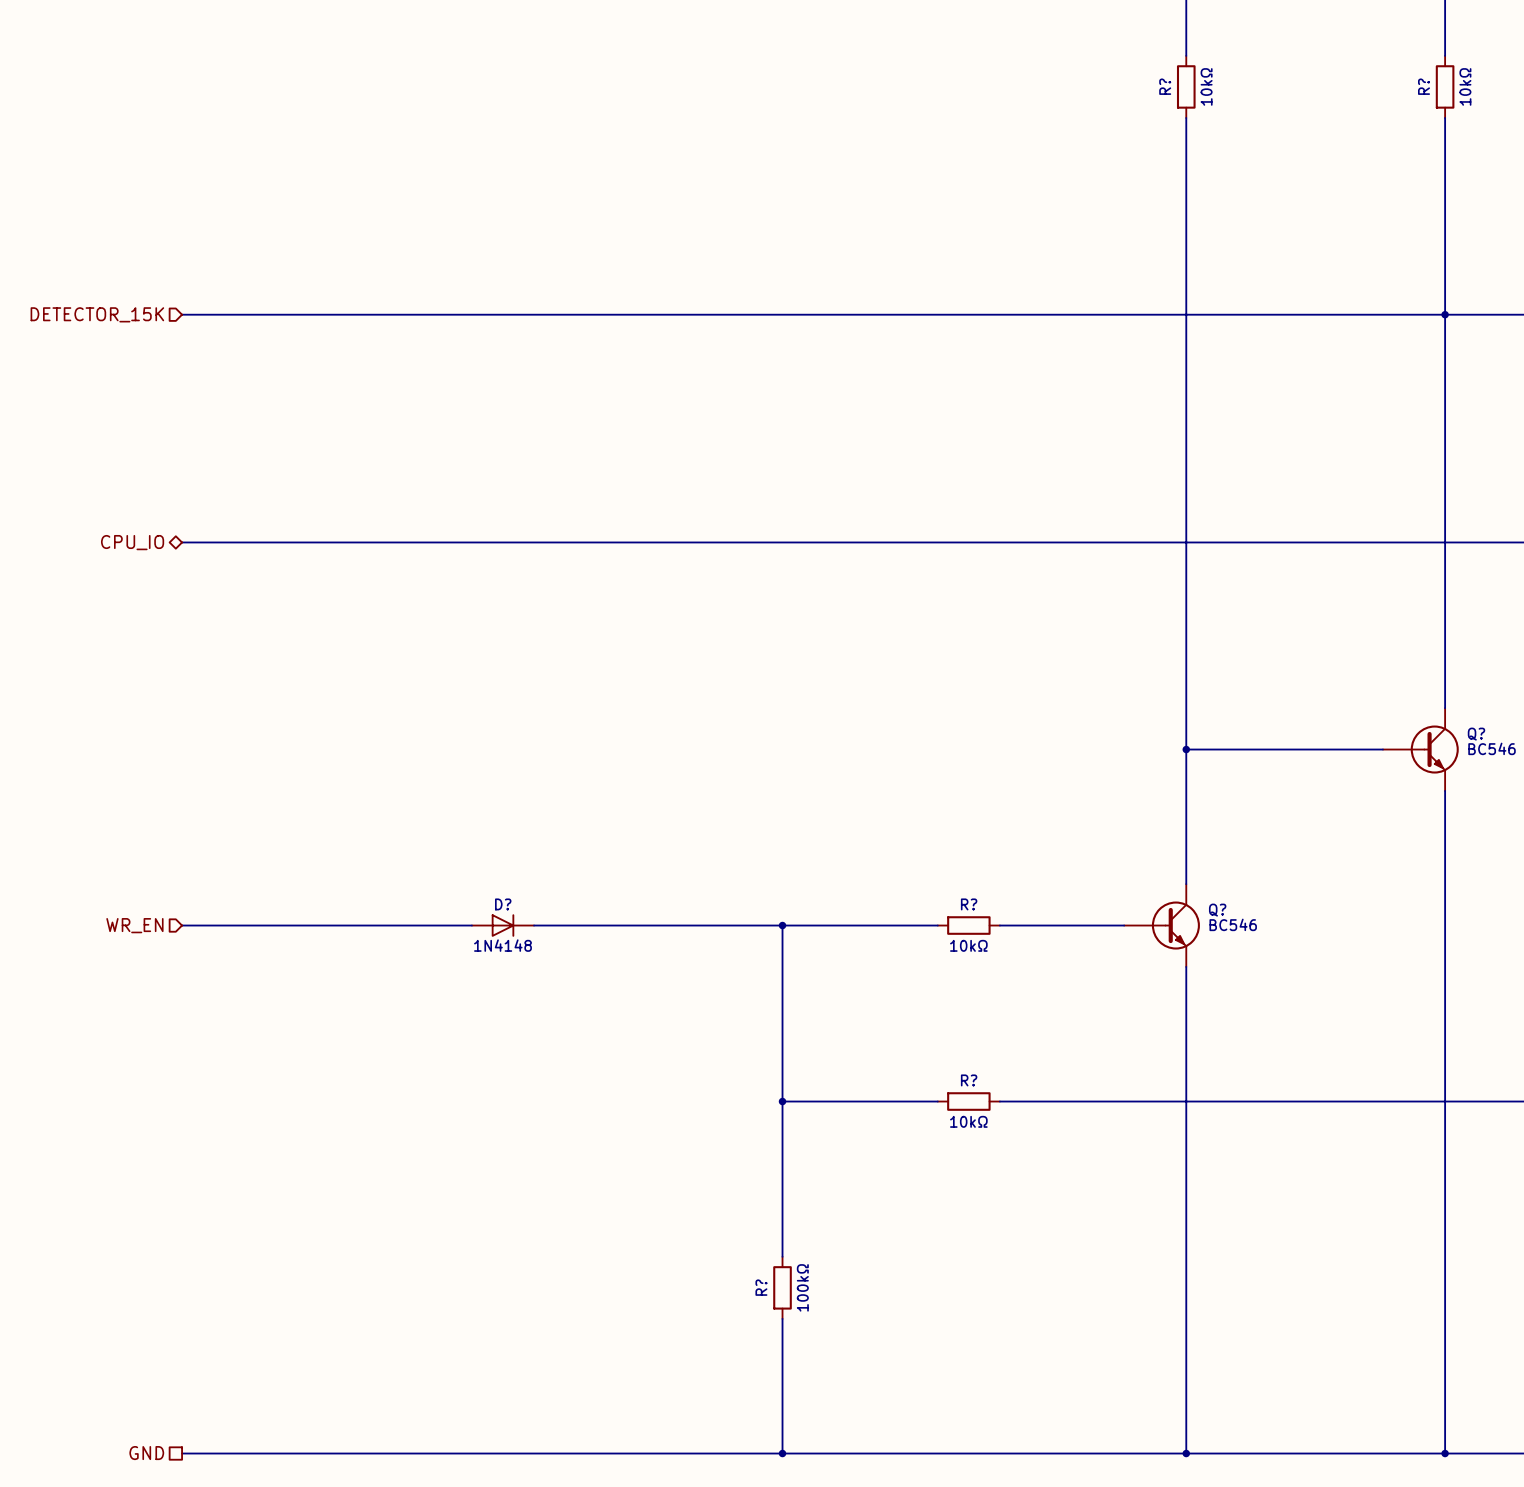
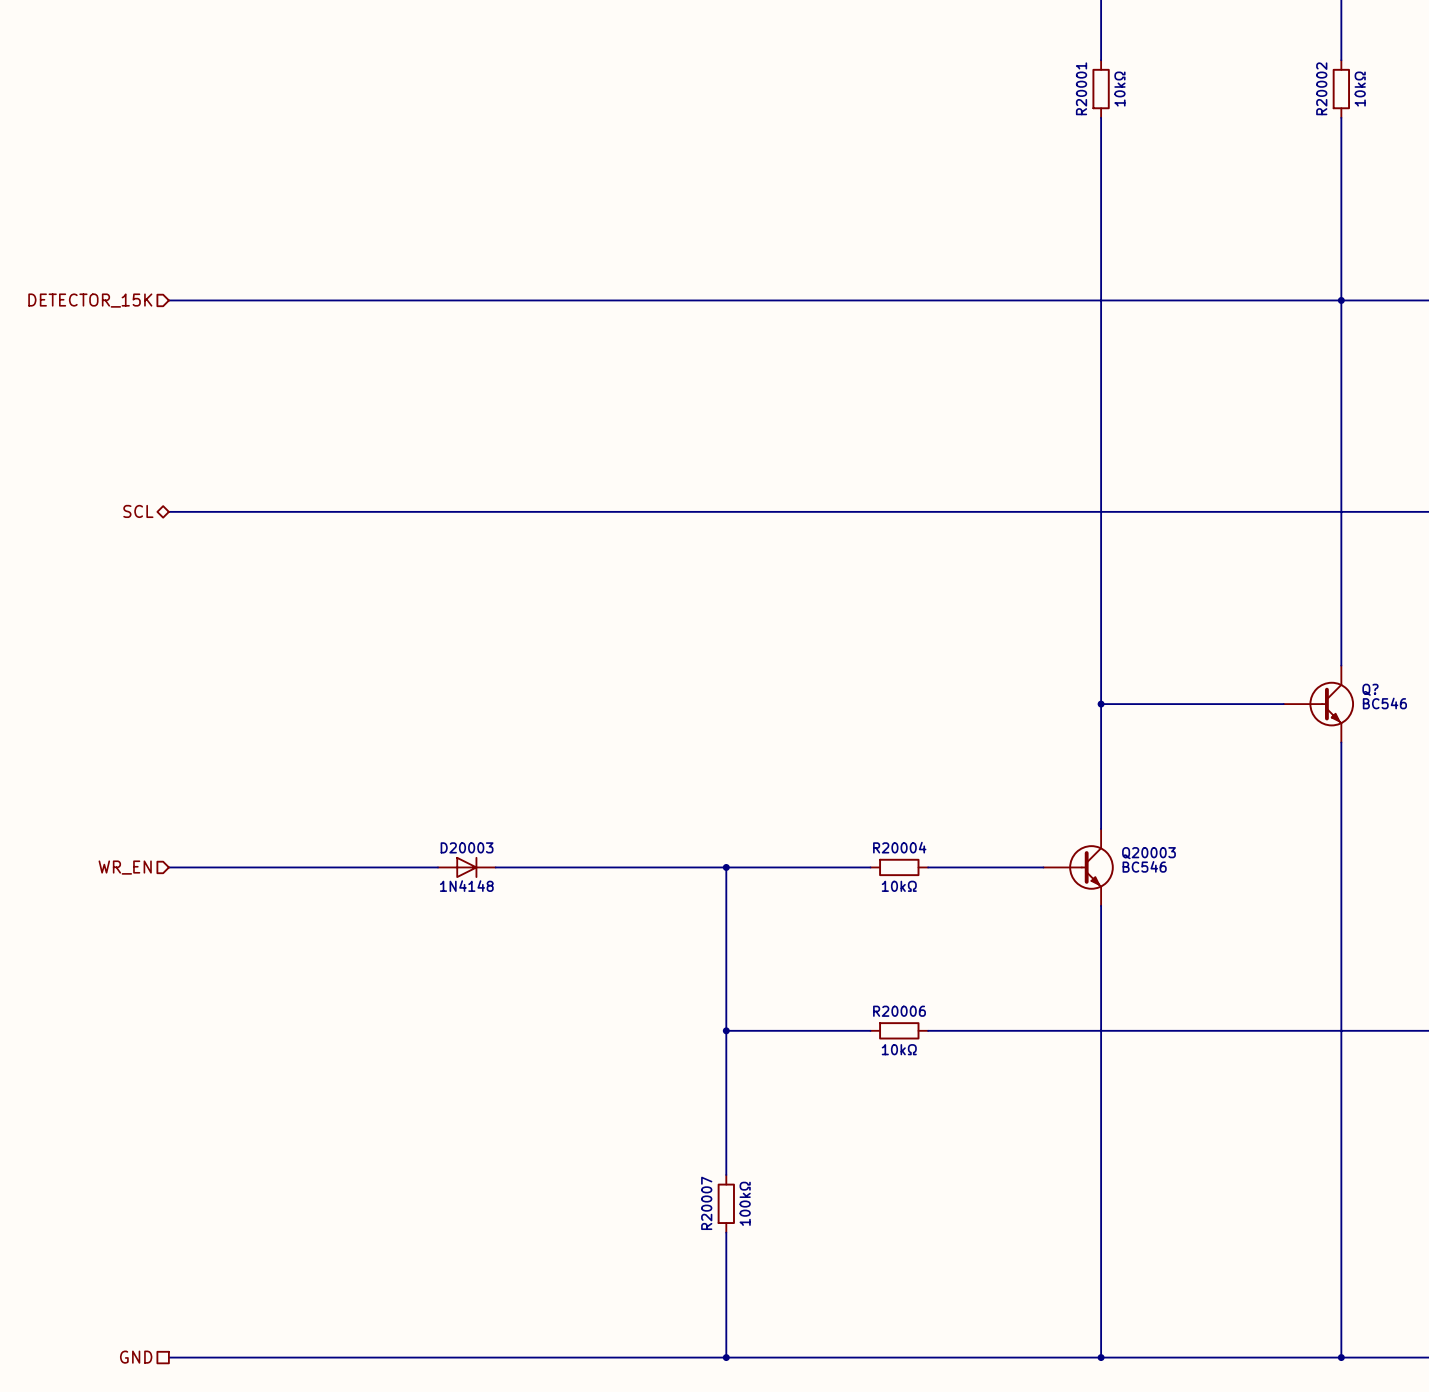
R? name: R? (1165, 86) -> R20001 (1081, 88)
R? name: R? (1424, 86) -> R20002 (1321, 88)
hierarchical label: CPU_IO (132, 542) -> SCL (138, 511)
D? name: D? (503, 904) -> D20003 (467, 847)
R? name: R? (969, 904) -> R20004 (899, 847)
Q? name: Q? (1217, 910) -> Q20003 (1148, 853)
R? name: R? (969, 1080) -> R20006 (899, 1011)
R? name: R? (761, 1287) -> R20007 (706, 1203)

